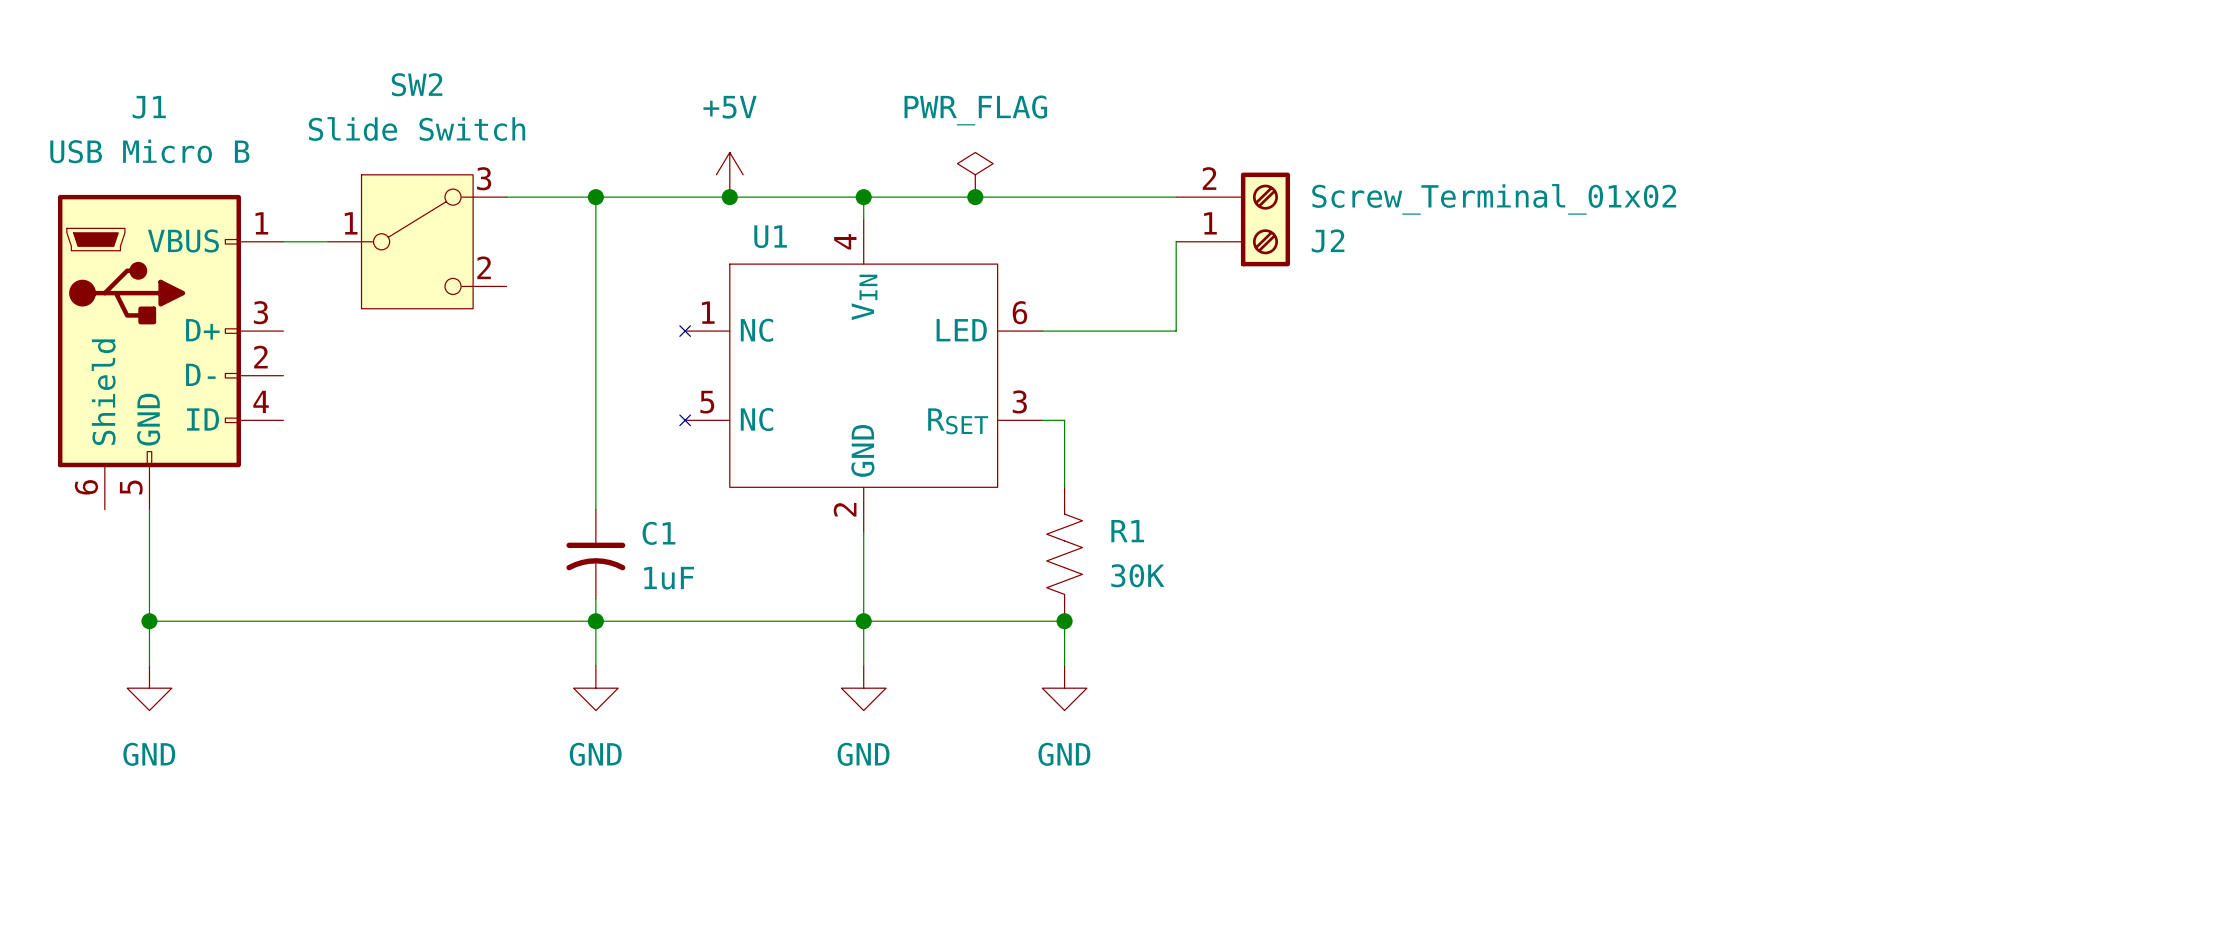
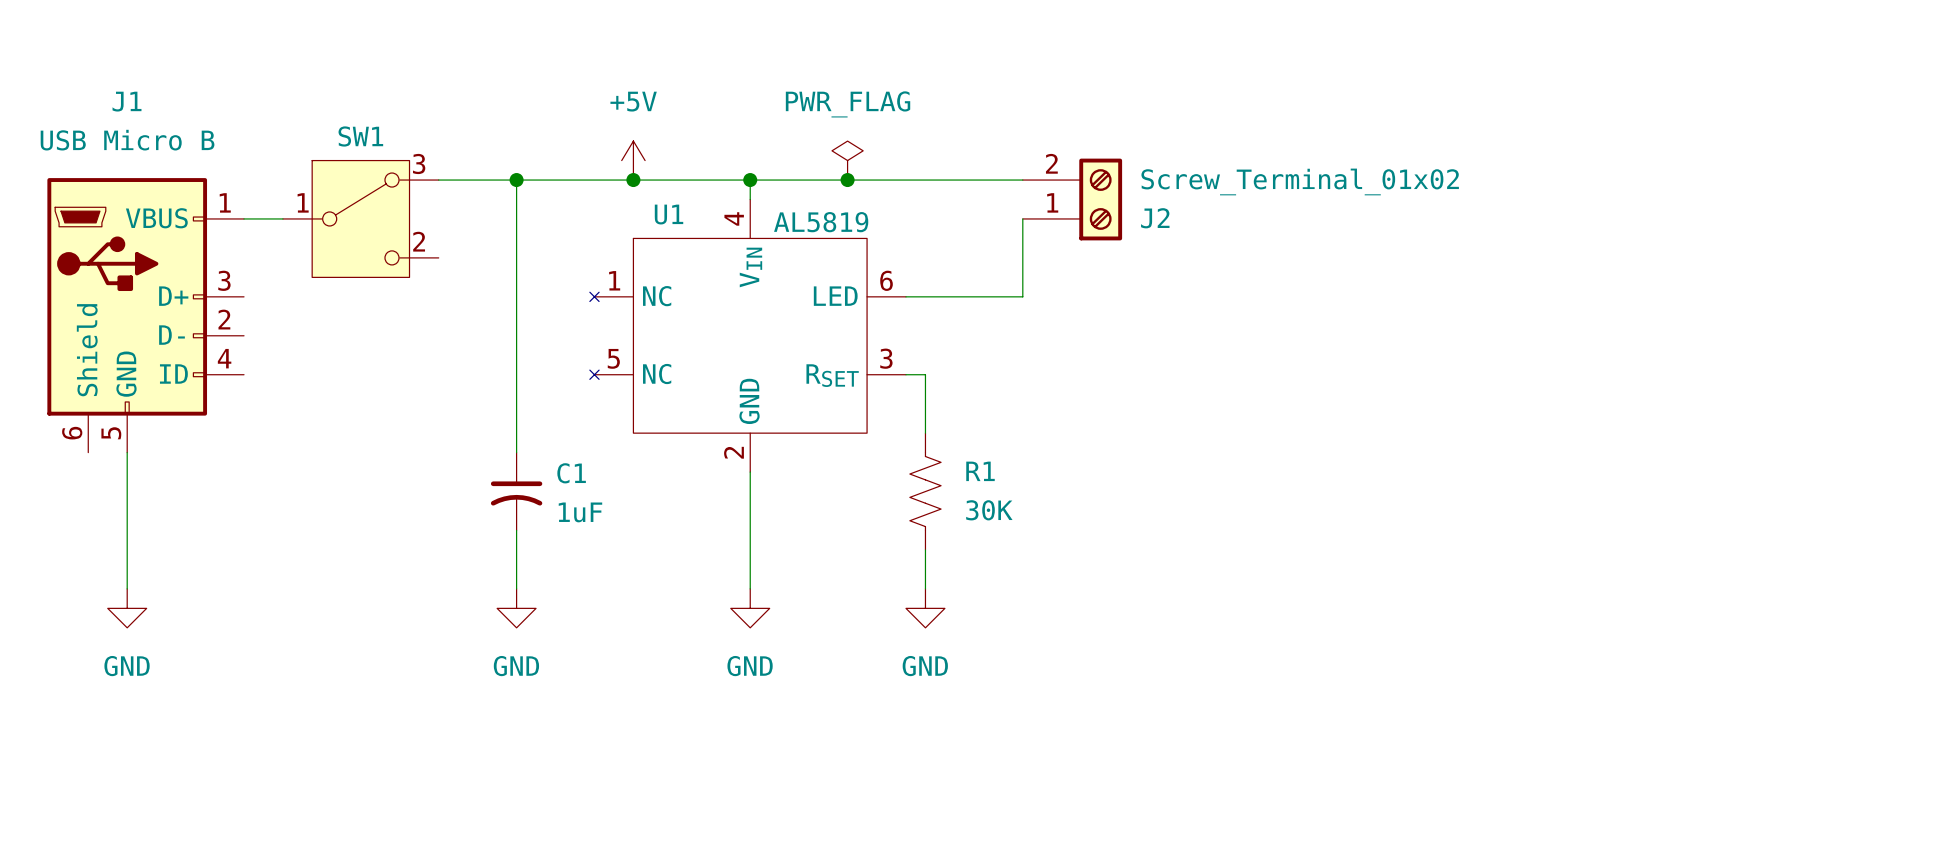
SW2 name: SW2 (417, 84) -> SW1 (360, 136)
SW2 value: Slide Switch (416, 129) -> none
U1 value: none -> AL5819 (821, 222)
wire: (149, 621) (1064, 621) -> none
junction: (149, 621) -> none
junction: (595, 621) -> none
junction: (863, 621) -> none
junction: (1064, 621) -> none

